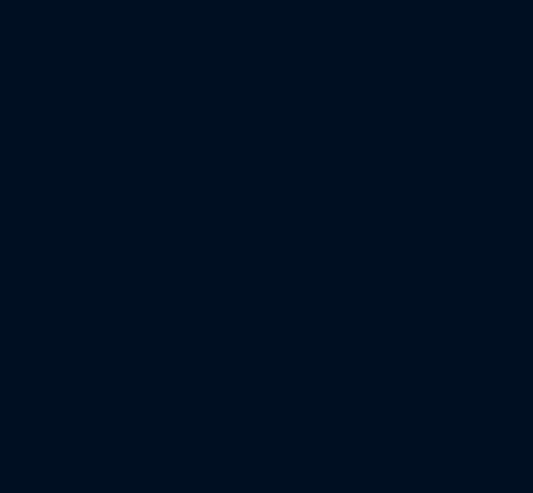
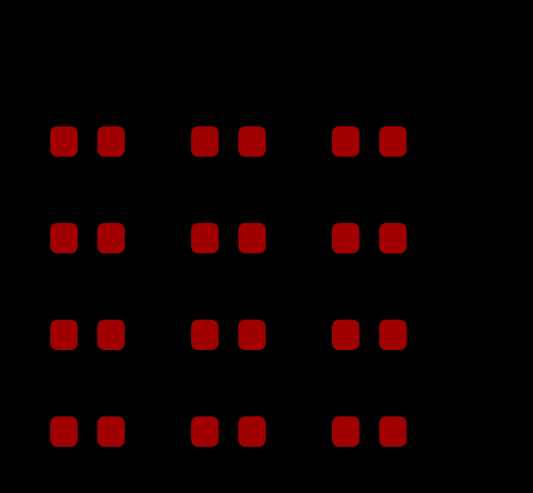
part: none -> (87, 141)
part: none -> (228, 141)
part: none -> (369, 141)
part: none -> (87, 238)
part: none -> (228, 238)
part: none -> (369, 238)
part: none -> (87, 334)
part: none -> (228, 334)
part: none -> (369, 334)
part: none -> (87, 431)
part: none -> (228, 431)
part: none -> (369, 431)

